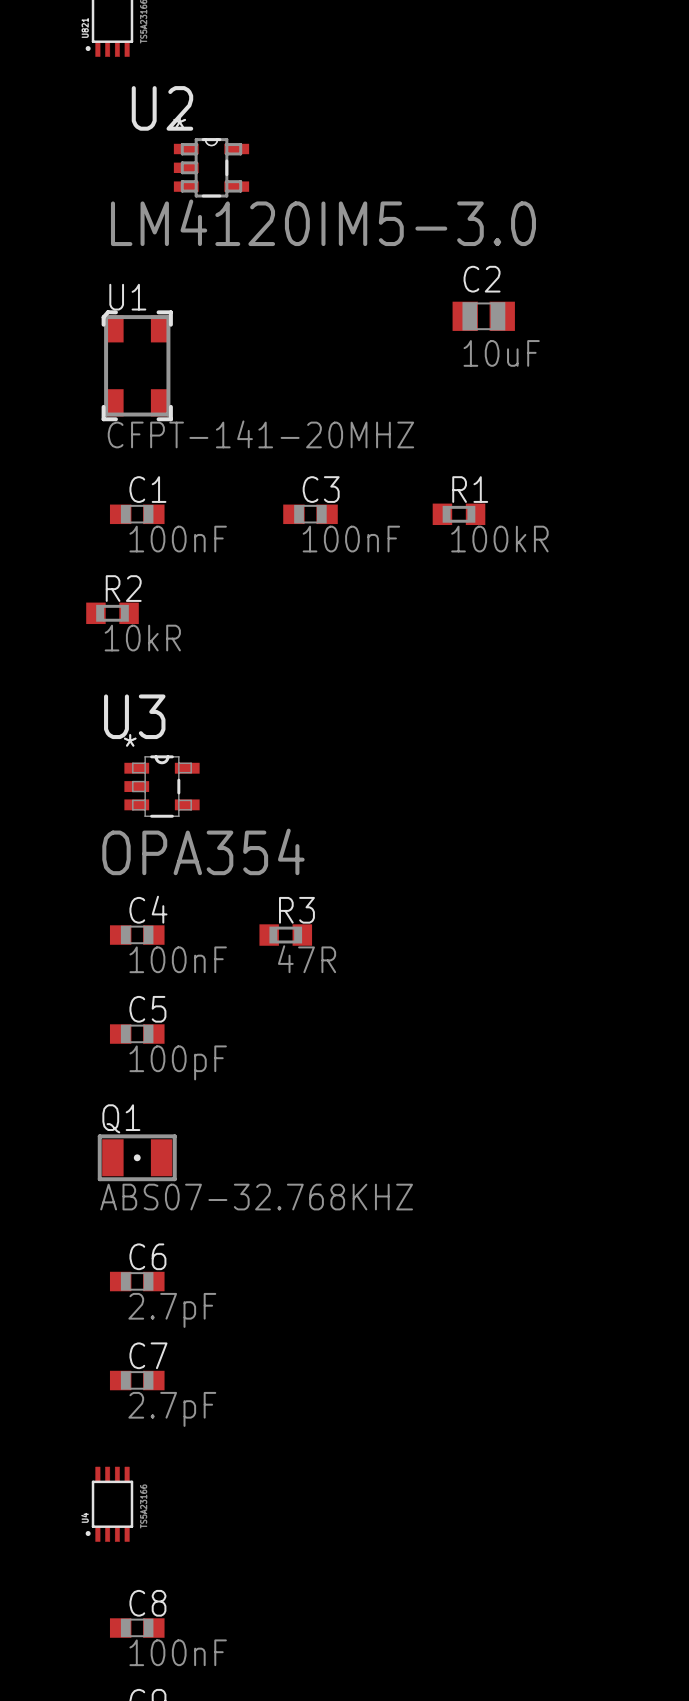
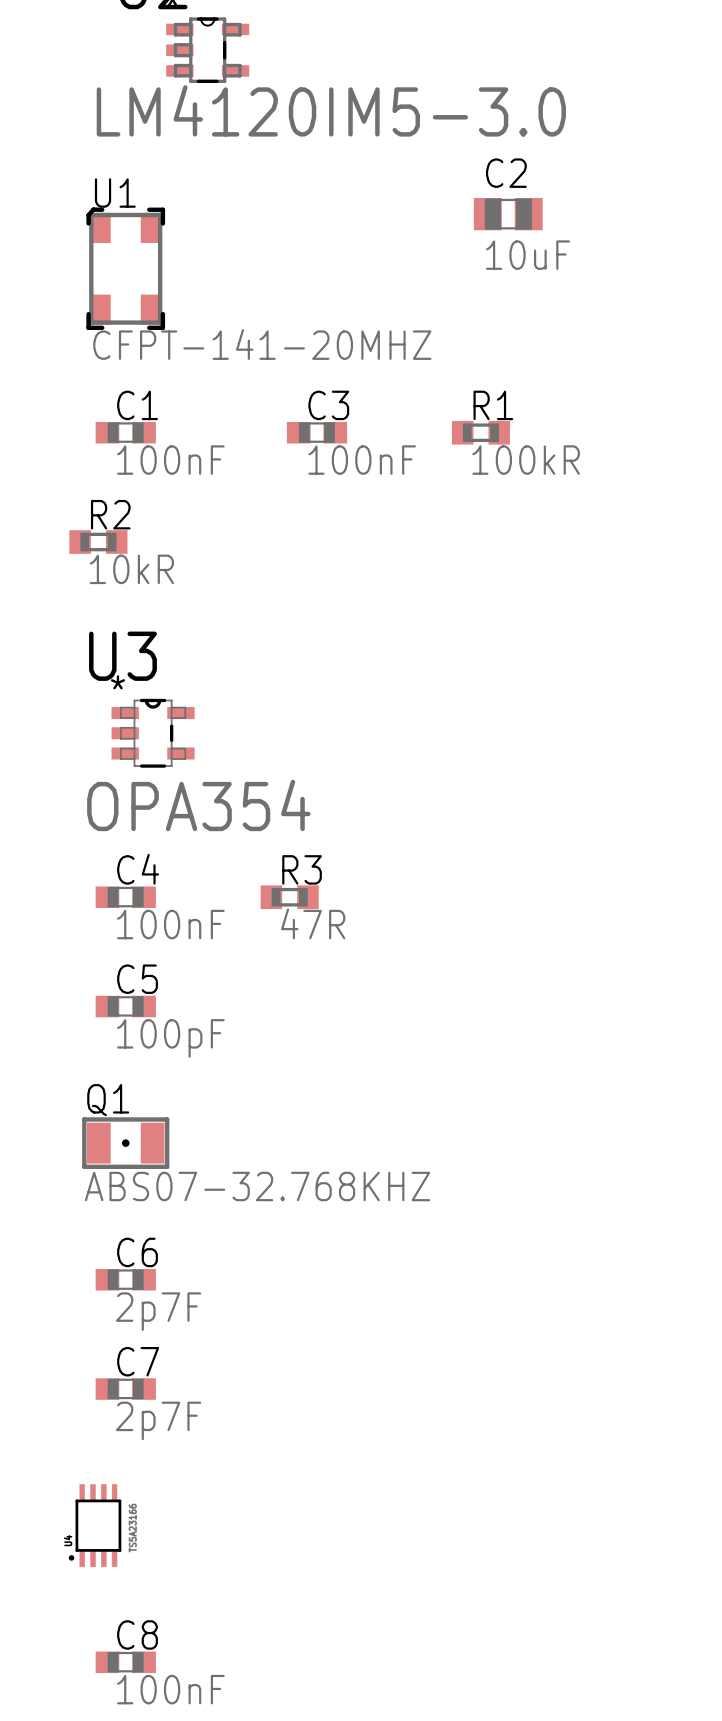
C6 value: 2.7pF (172, 1310) -> 2p7F (158, 1311)
C7 value: 2.7pF (172, 1409) -> 2p7F (158, 1420)

